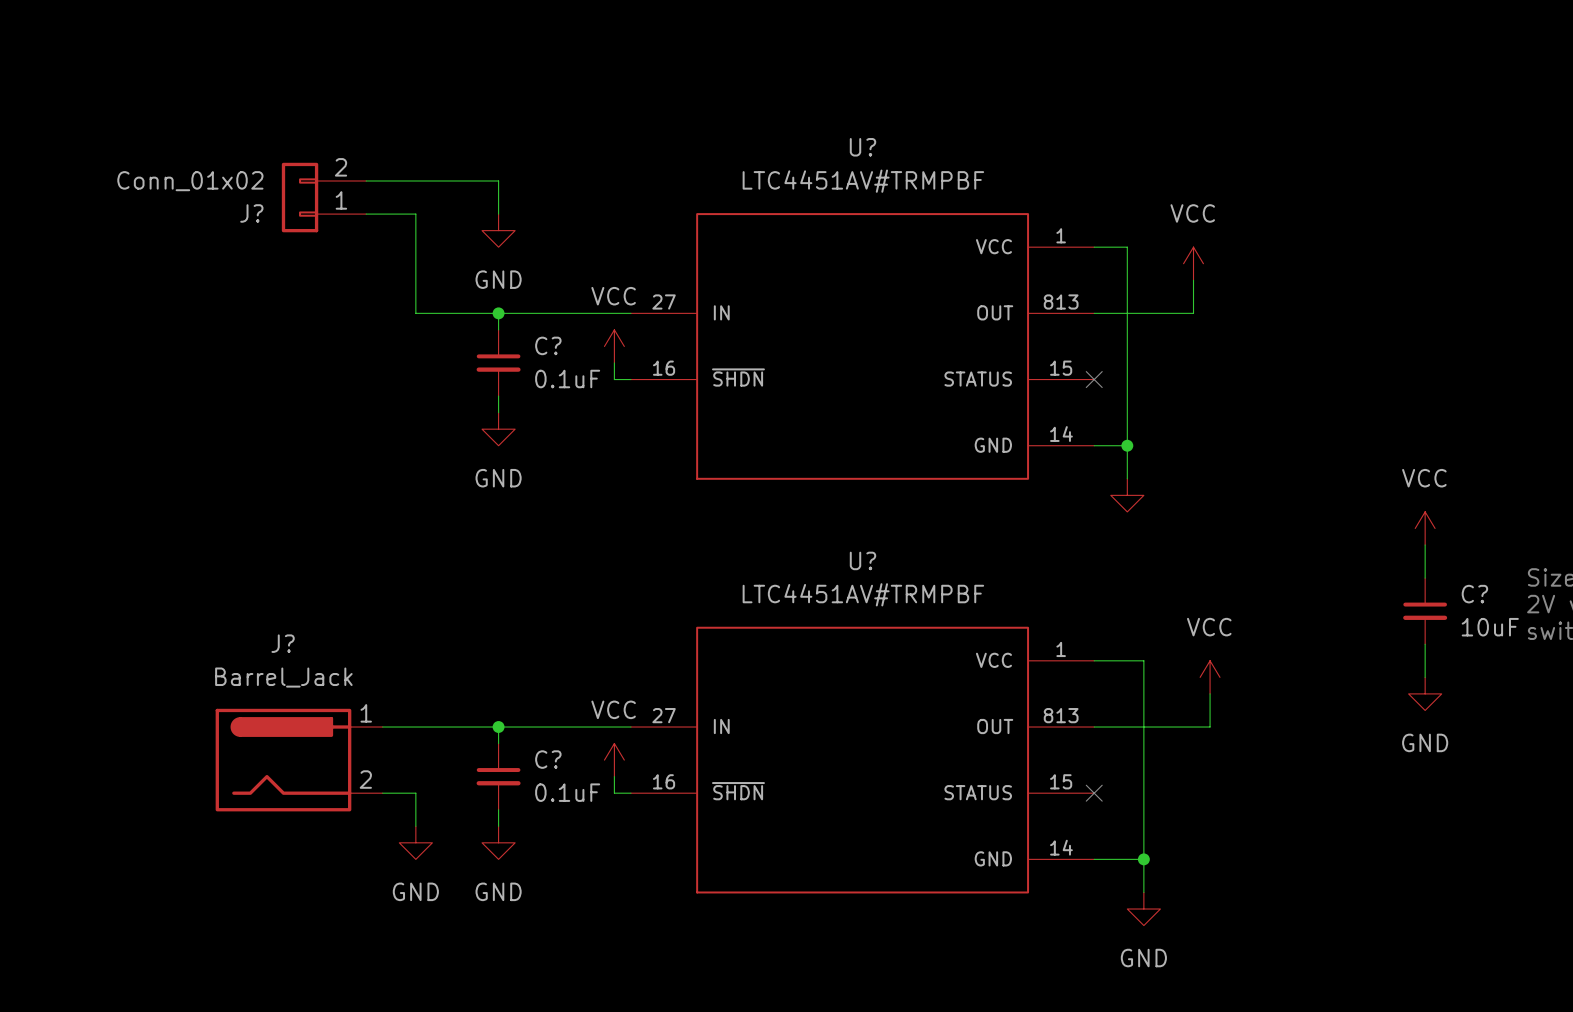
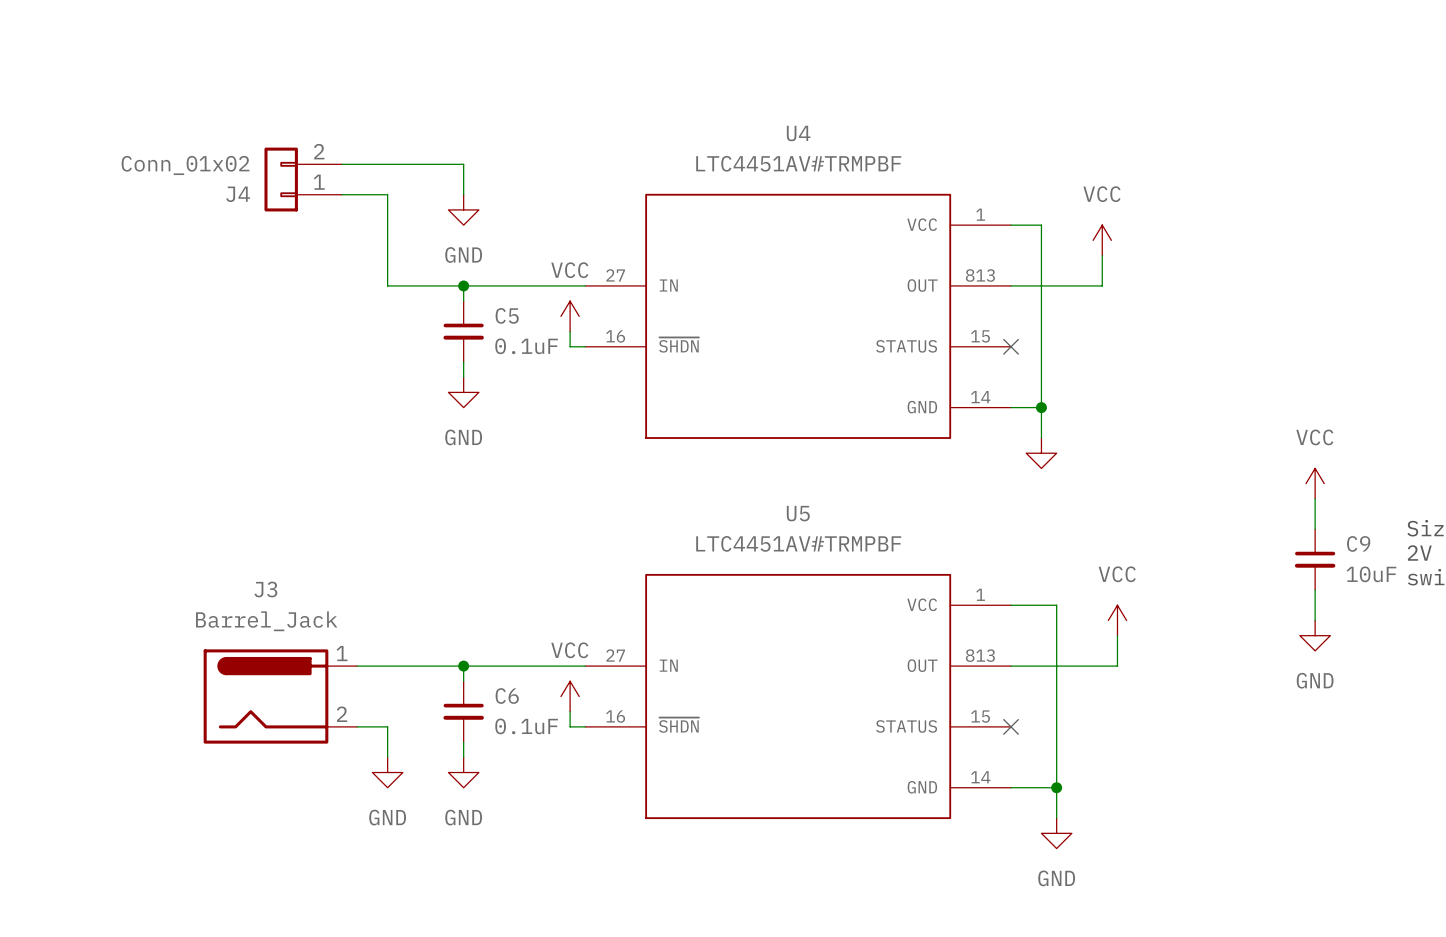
U? name: U? (862, 147) -> U4 (798, 133)
J? name: J? (251, 213) -> J4 (238, 194)
C? name: C? (548, 345) -> C5 (507, 315)
U? name: U? (862, 560) -> U5 (798, 513)
C? name: C? (1474, 594) -> C9 (1358, 543)
J? name: J? (283, 643) -> J3 (265, 589)
C? name: C? (548, 759) -> C6 (507, 696)

